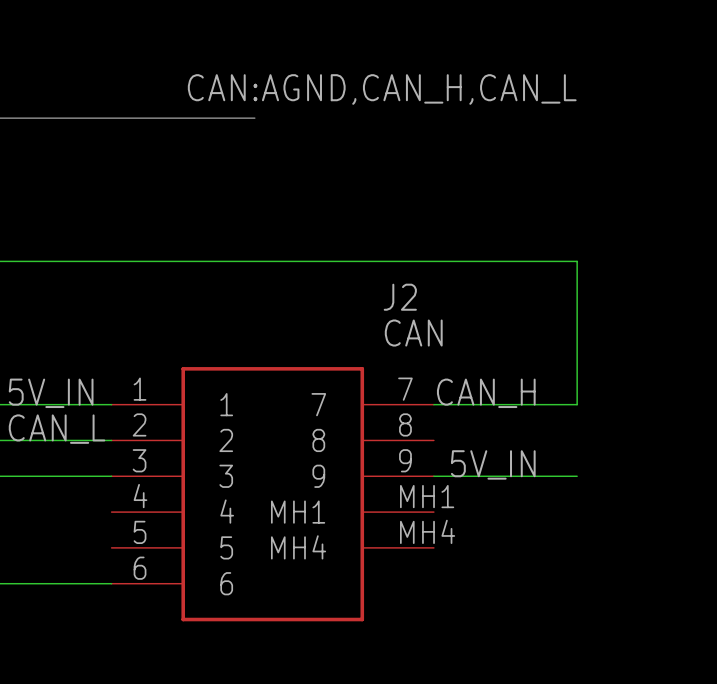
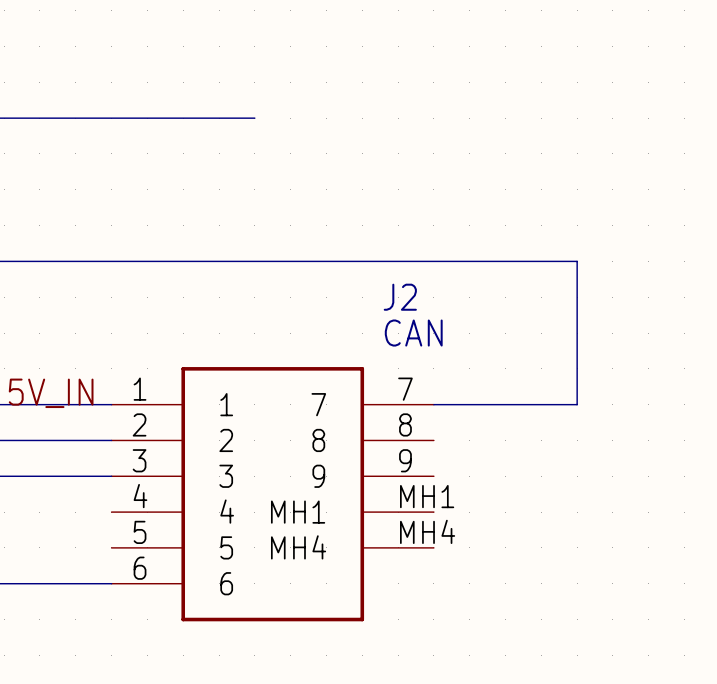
label: CAN:AGND,CAN_H,CAN_L (382, 89) -> none
label: CAN_H (486, 393) -> none
label: CAN_L (57, 429) -> none
label: 5V_IN (493, 464) -> none
wire: (433, 476) (577, 476) -> none

